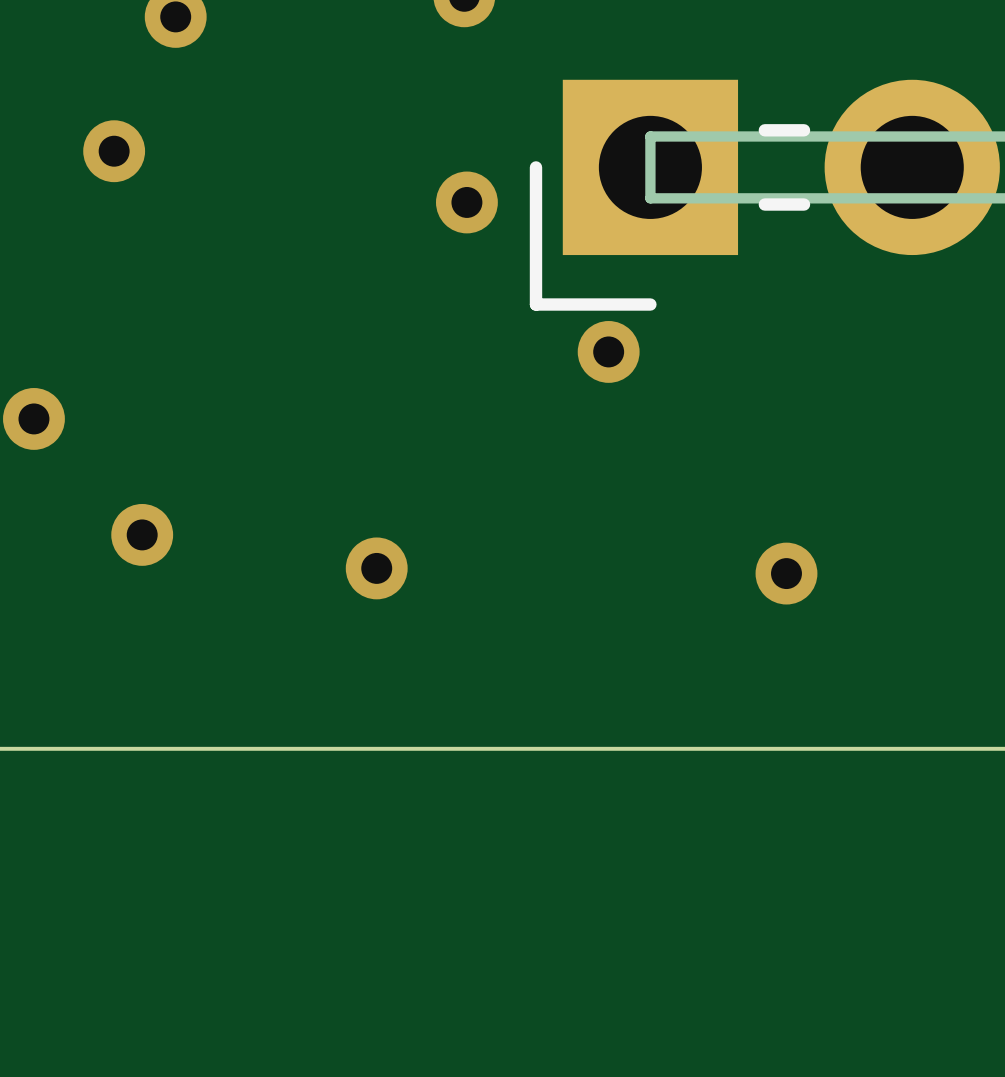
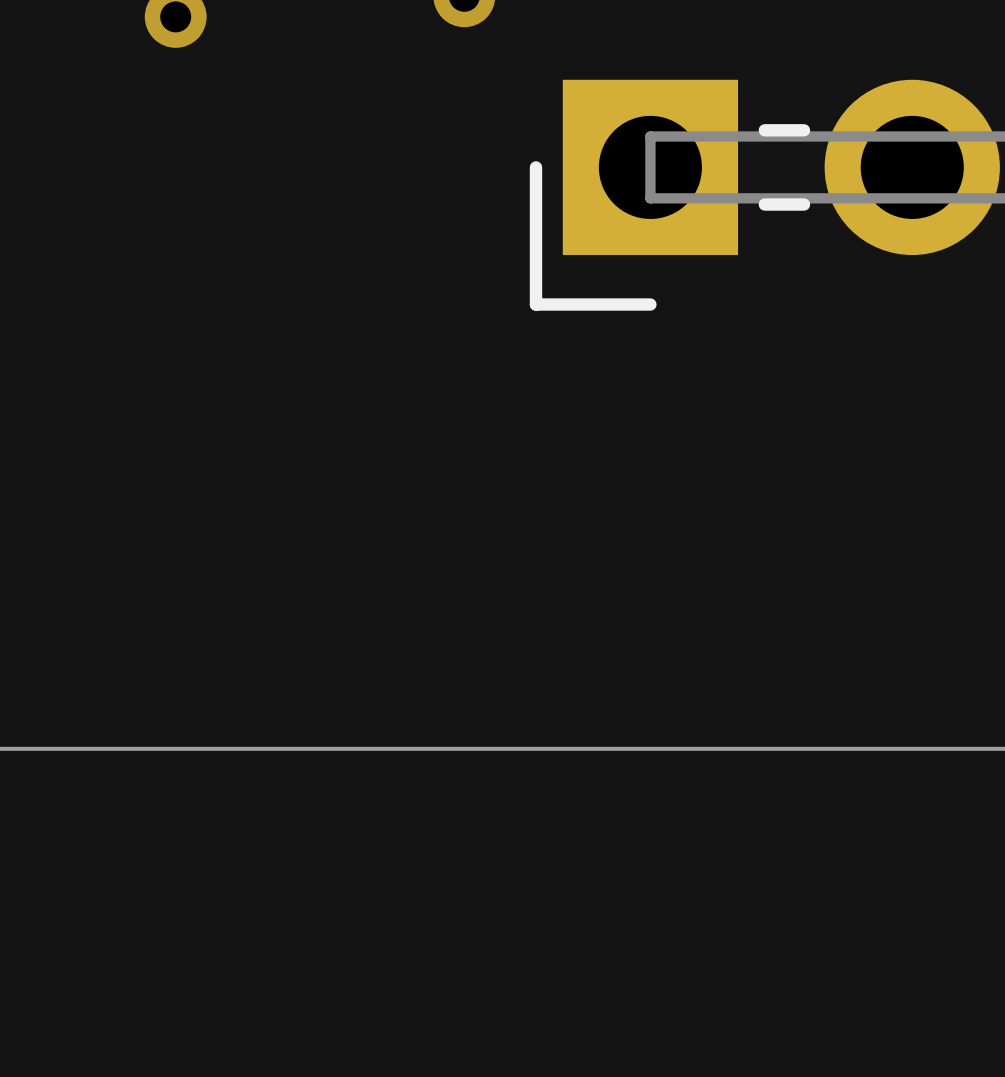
via: (114, 151) -> none
via: (466, 202) -> none
via: (608, 351) -> none
via: (33, 418) -> none
via: (142, 534) -> none
via: (376, 568) -> none
via: (786, 573) -> none

